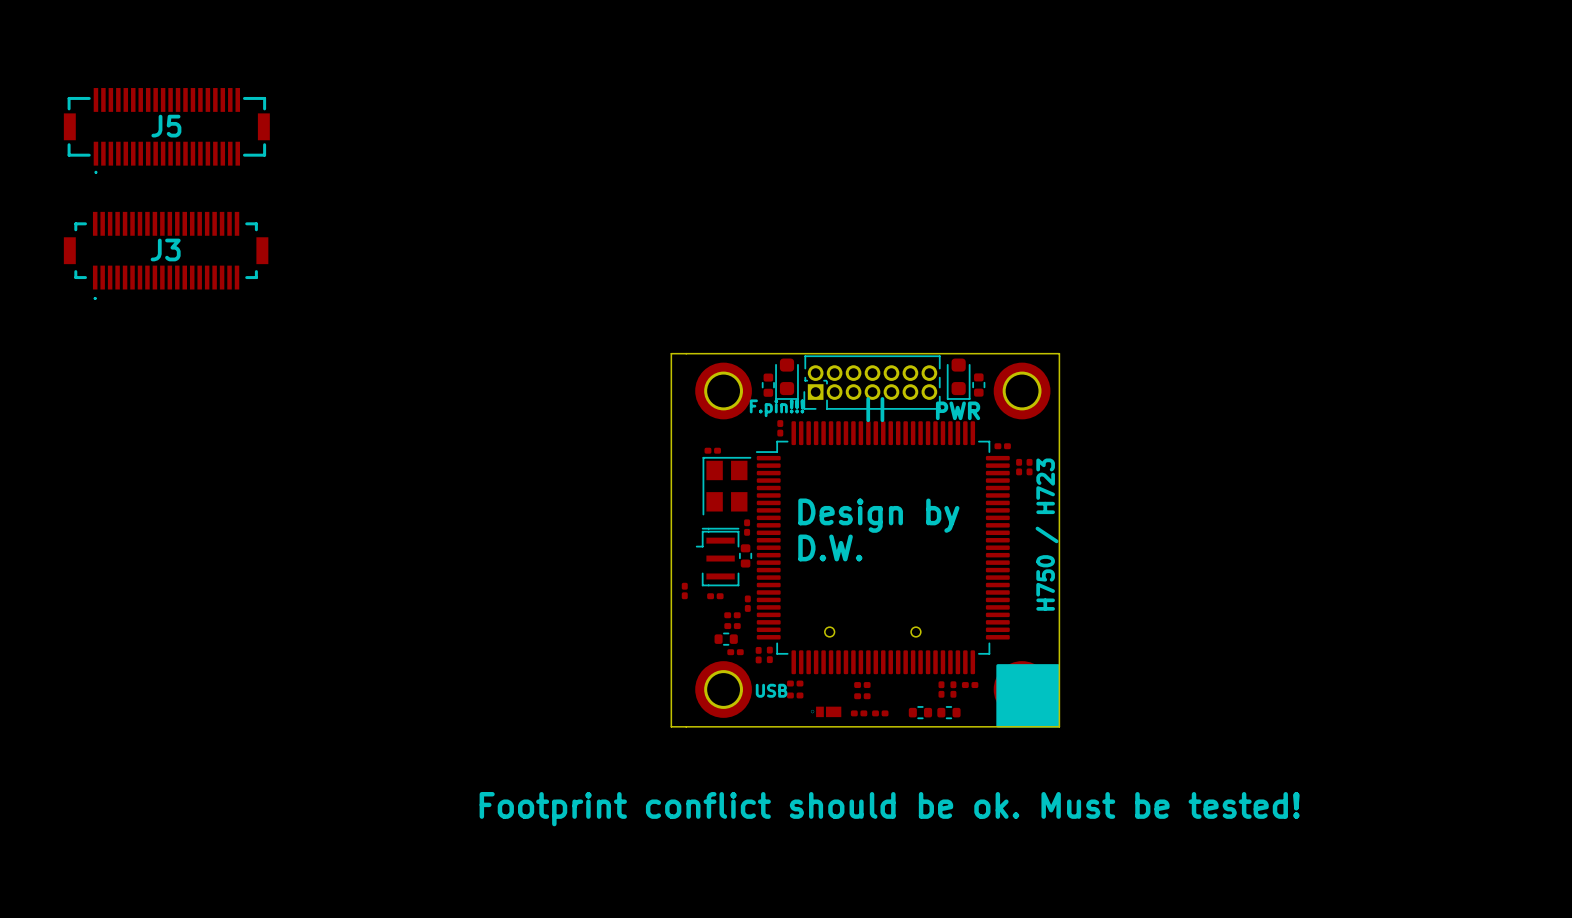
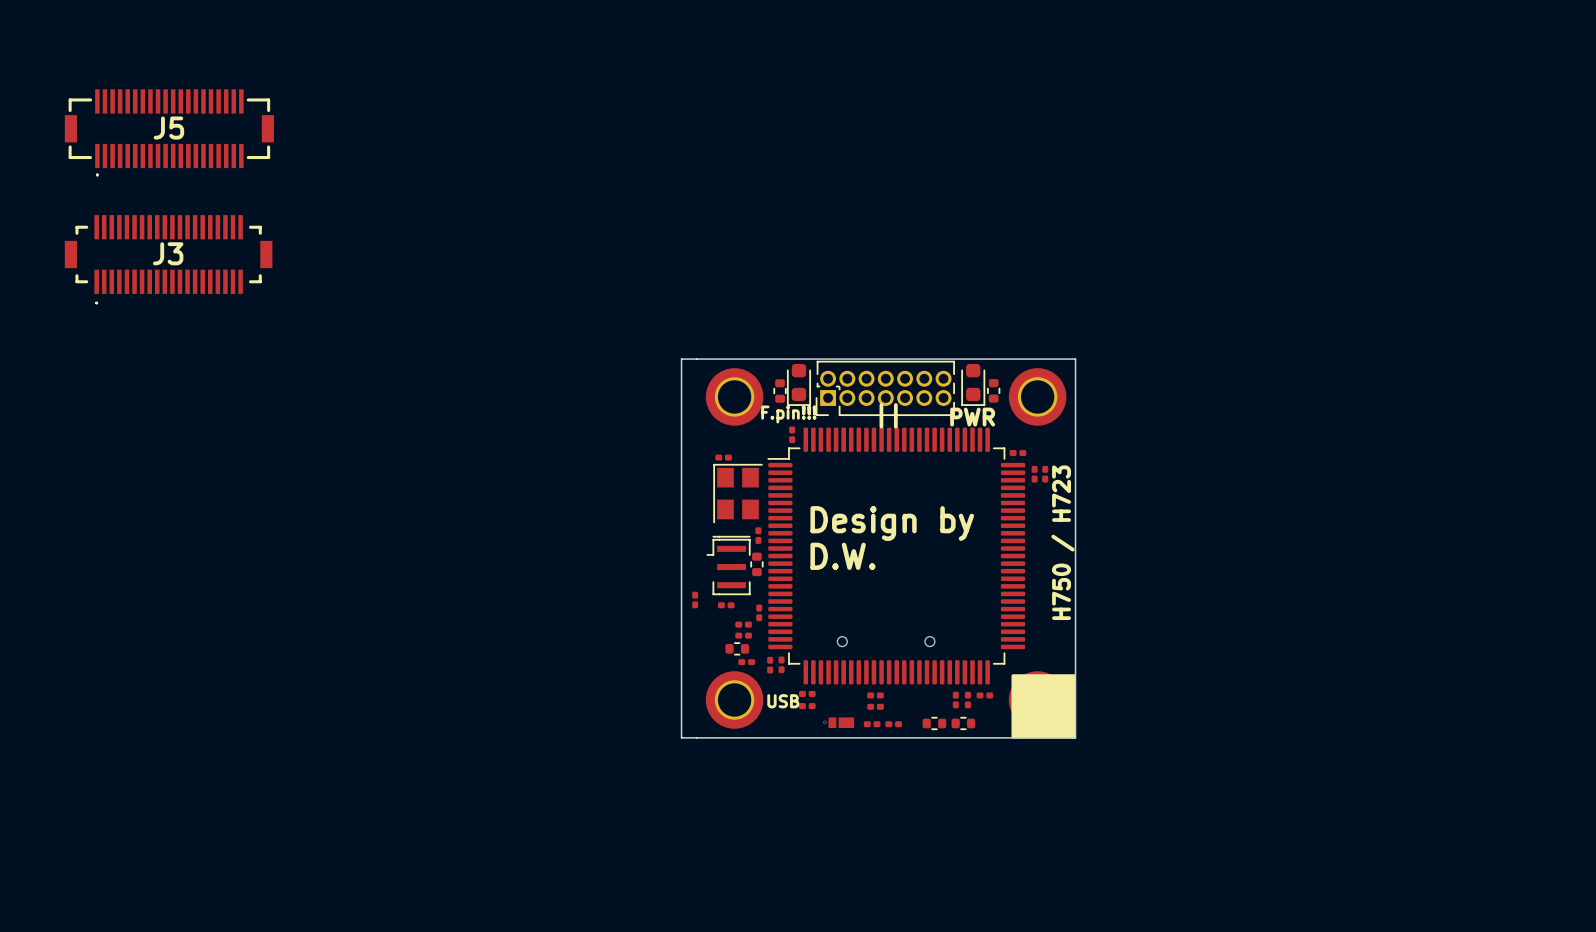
text: Footprint conflict should be ok. Must be tested! (889, 809) -> none

